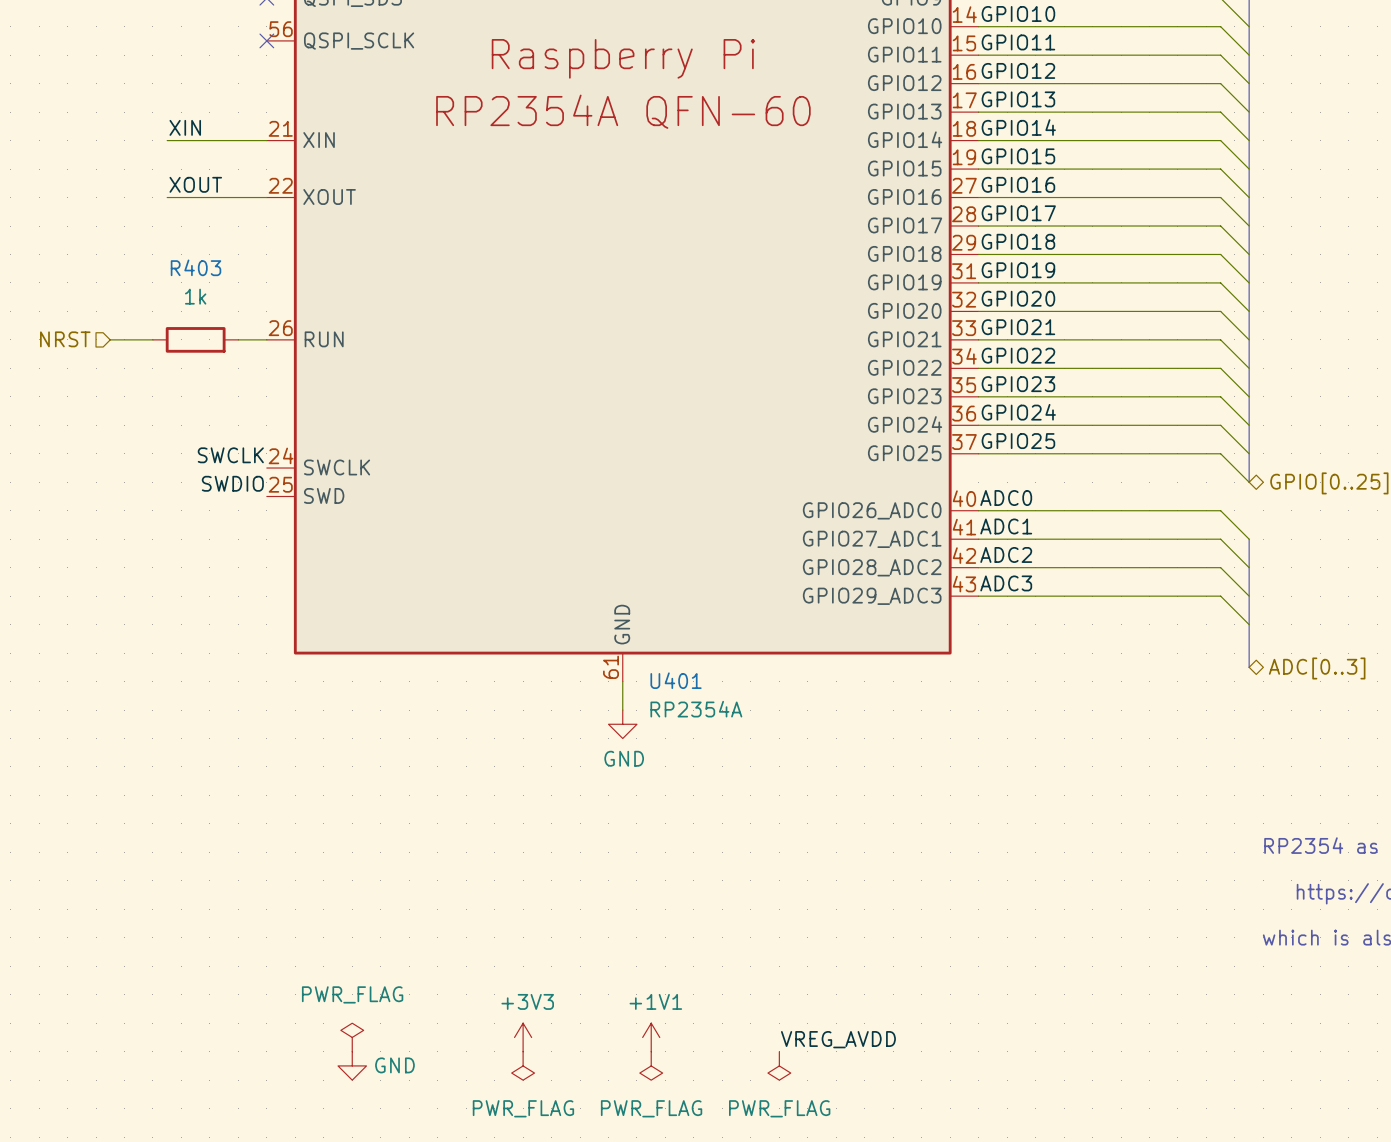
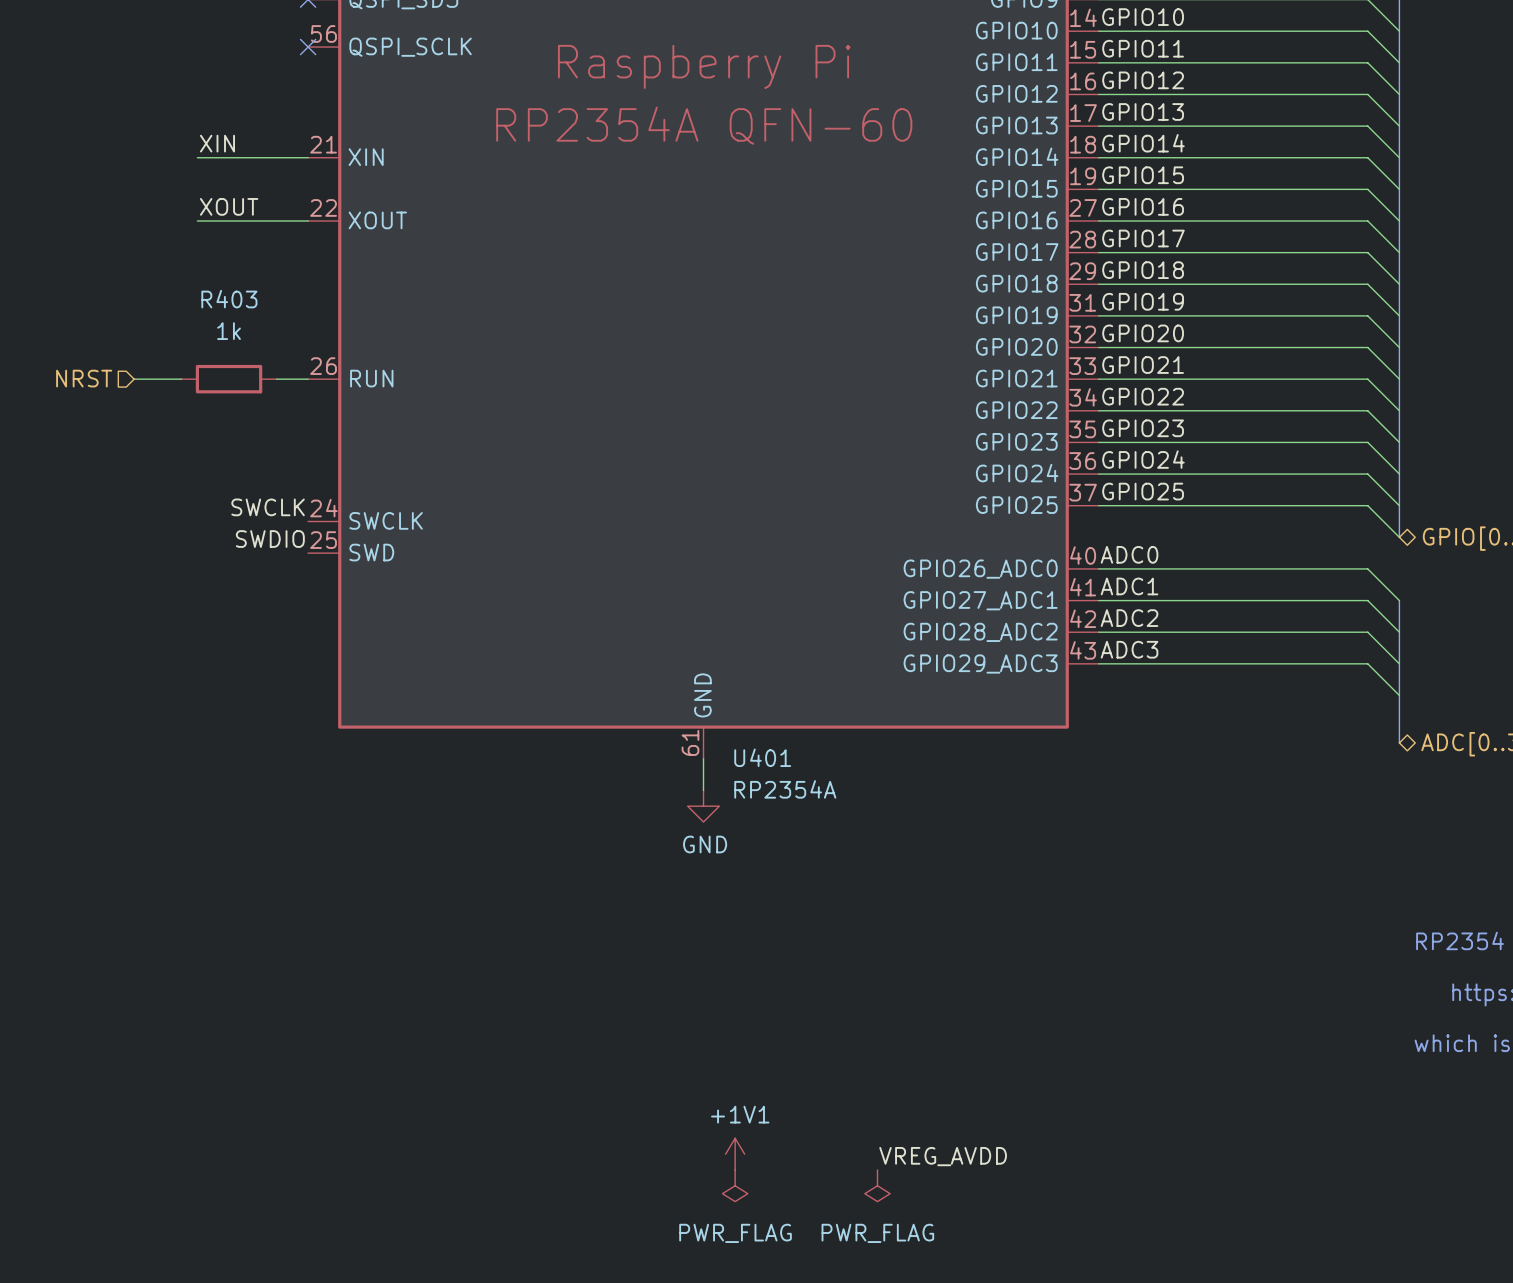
power symbol: PWR_FLAG (352, 1037) -> none
power symbol: +3V3 (523, 1037) -> none
power symbol: GND (352, 1065) -> none
power symbol: PWR_FLAG (523, 1065) -> none

